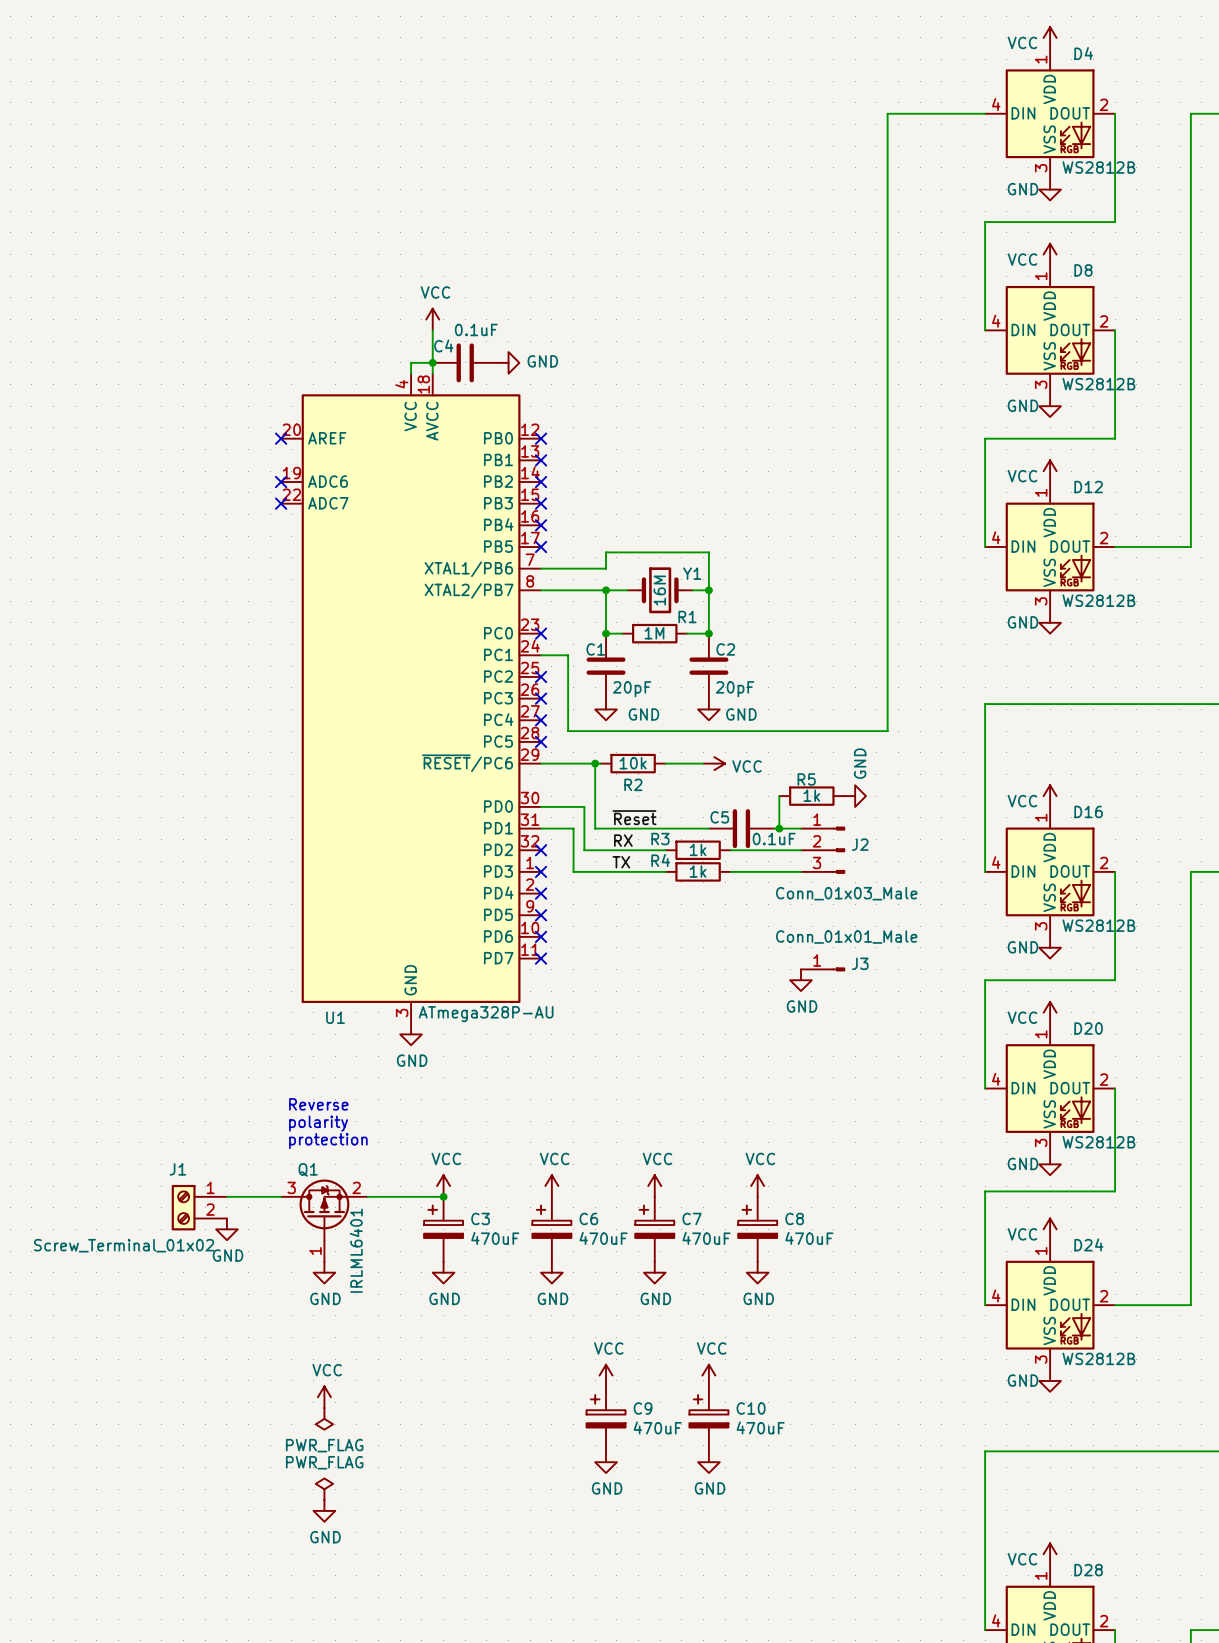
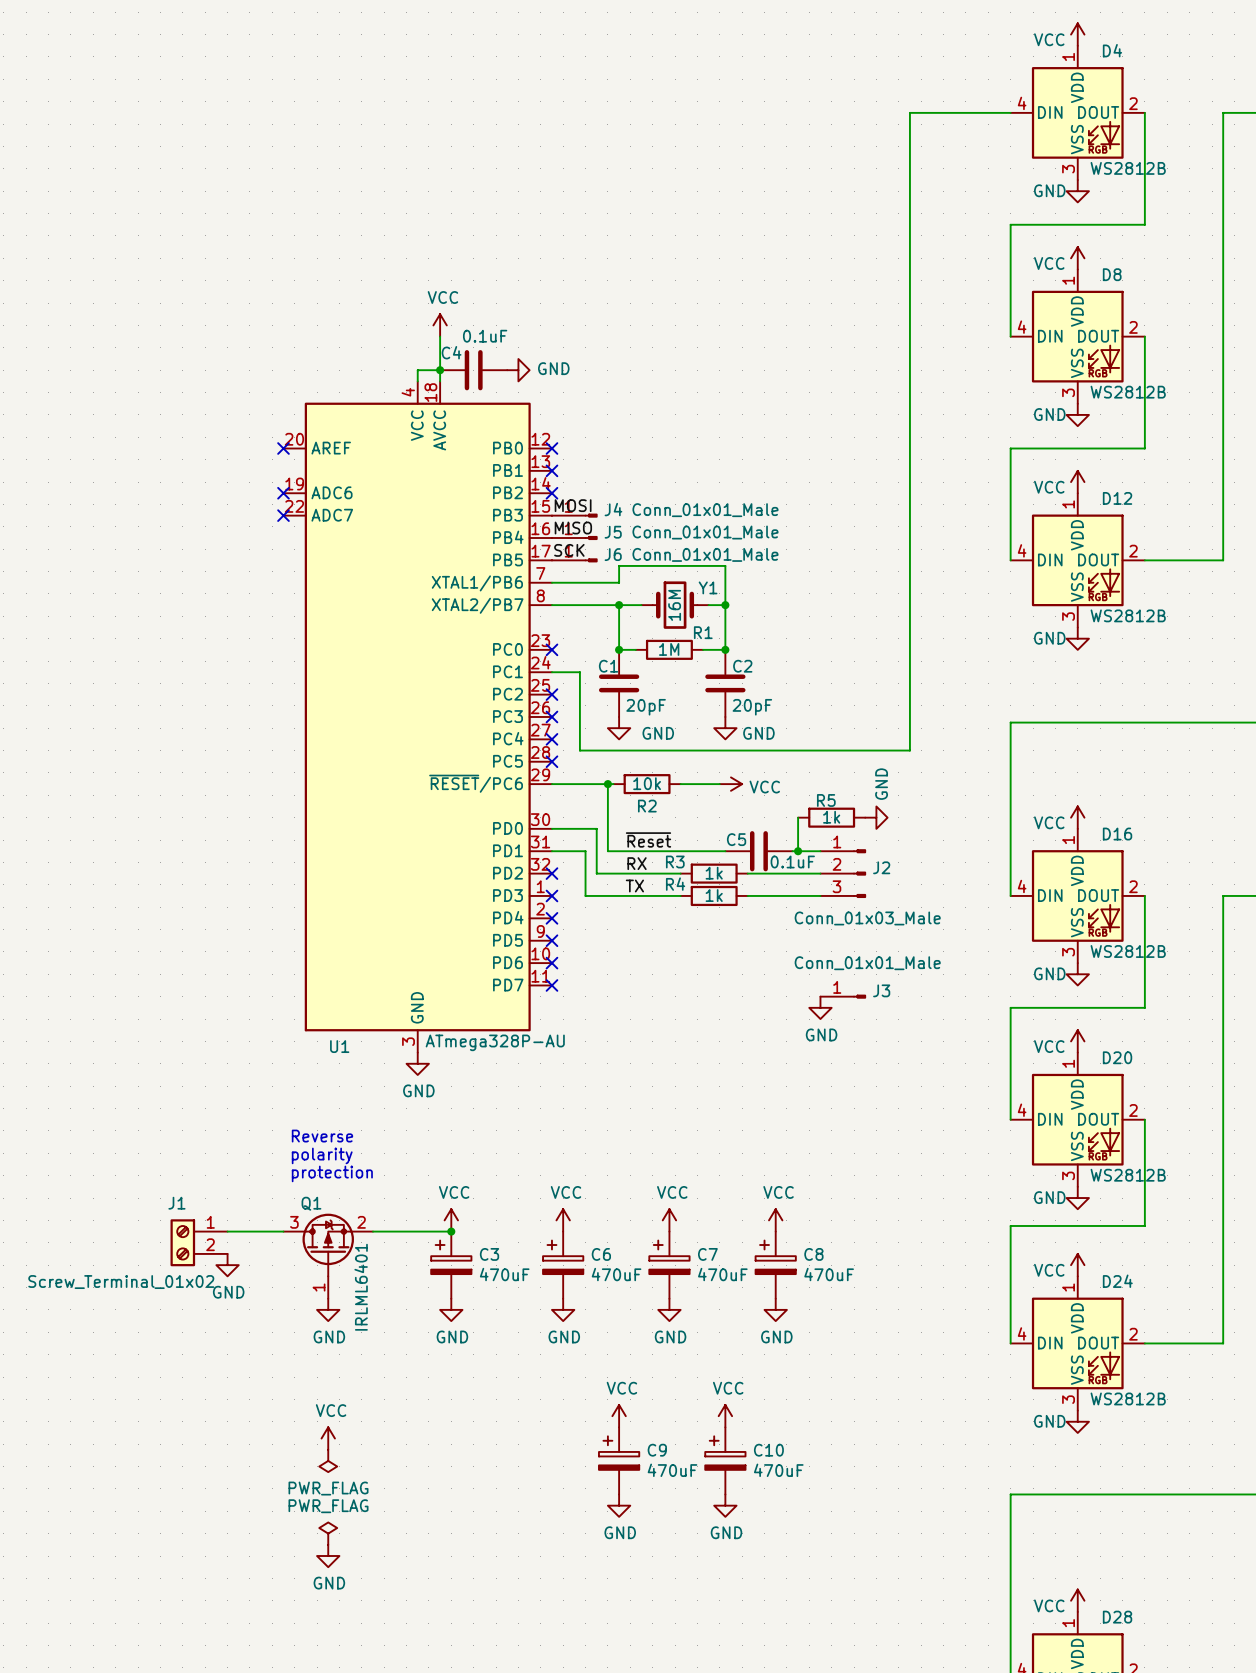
label: none -> MOSI (573, 505)
no-connect mark: (541, 503) -> none
J4: none -> Conn_01x01_Male (574, 515)
label: none -> MISO (573, 528)
no-connect mark: (541, 525) -> none
J5: none -> Conn_01x01_Male (574, 537)
label: none -> SCK (569, 550)
no-connect mark: (541, 546) -> none
J6: none -> Conn_01x01_Male (574, 560)

